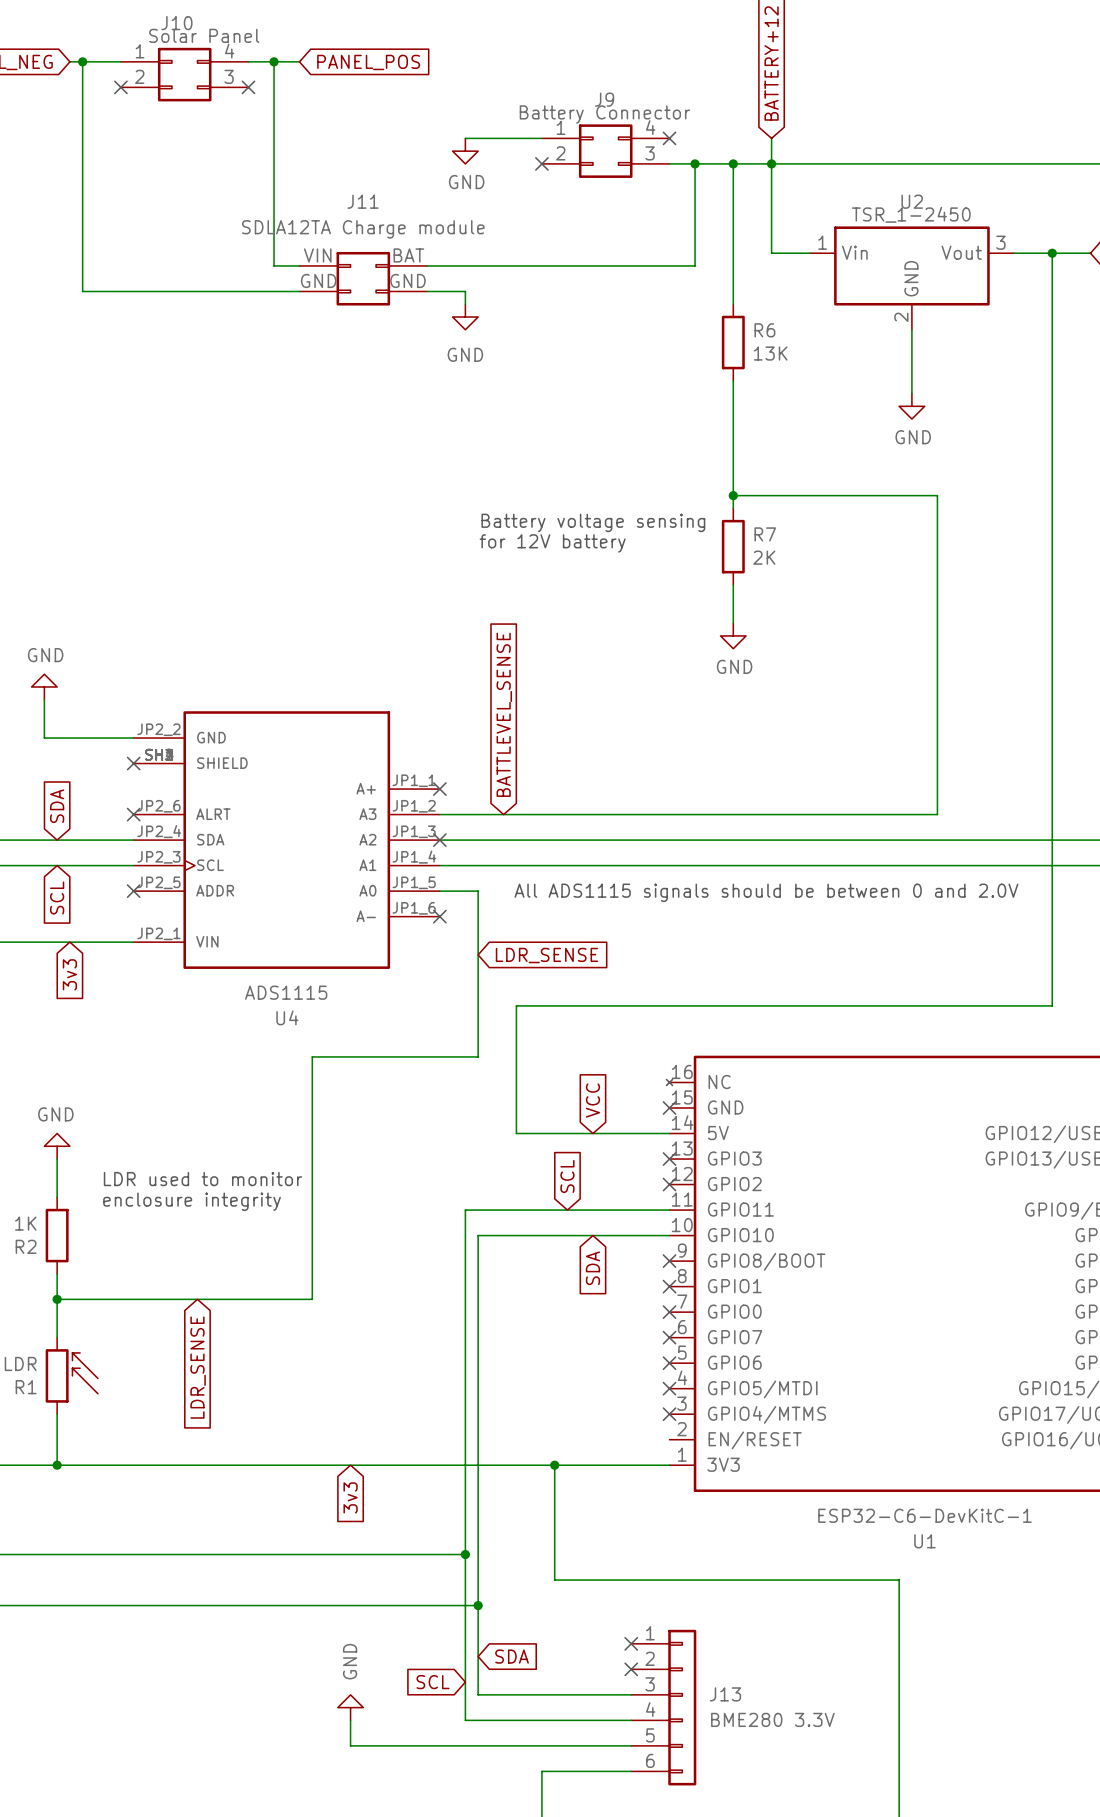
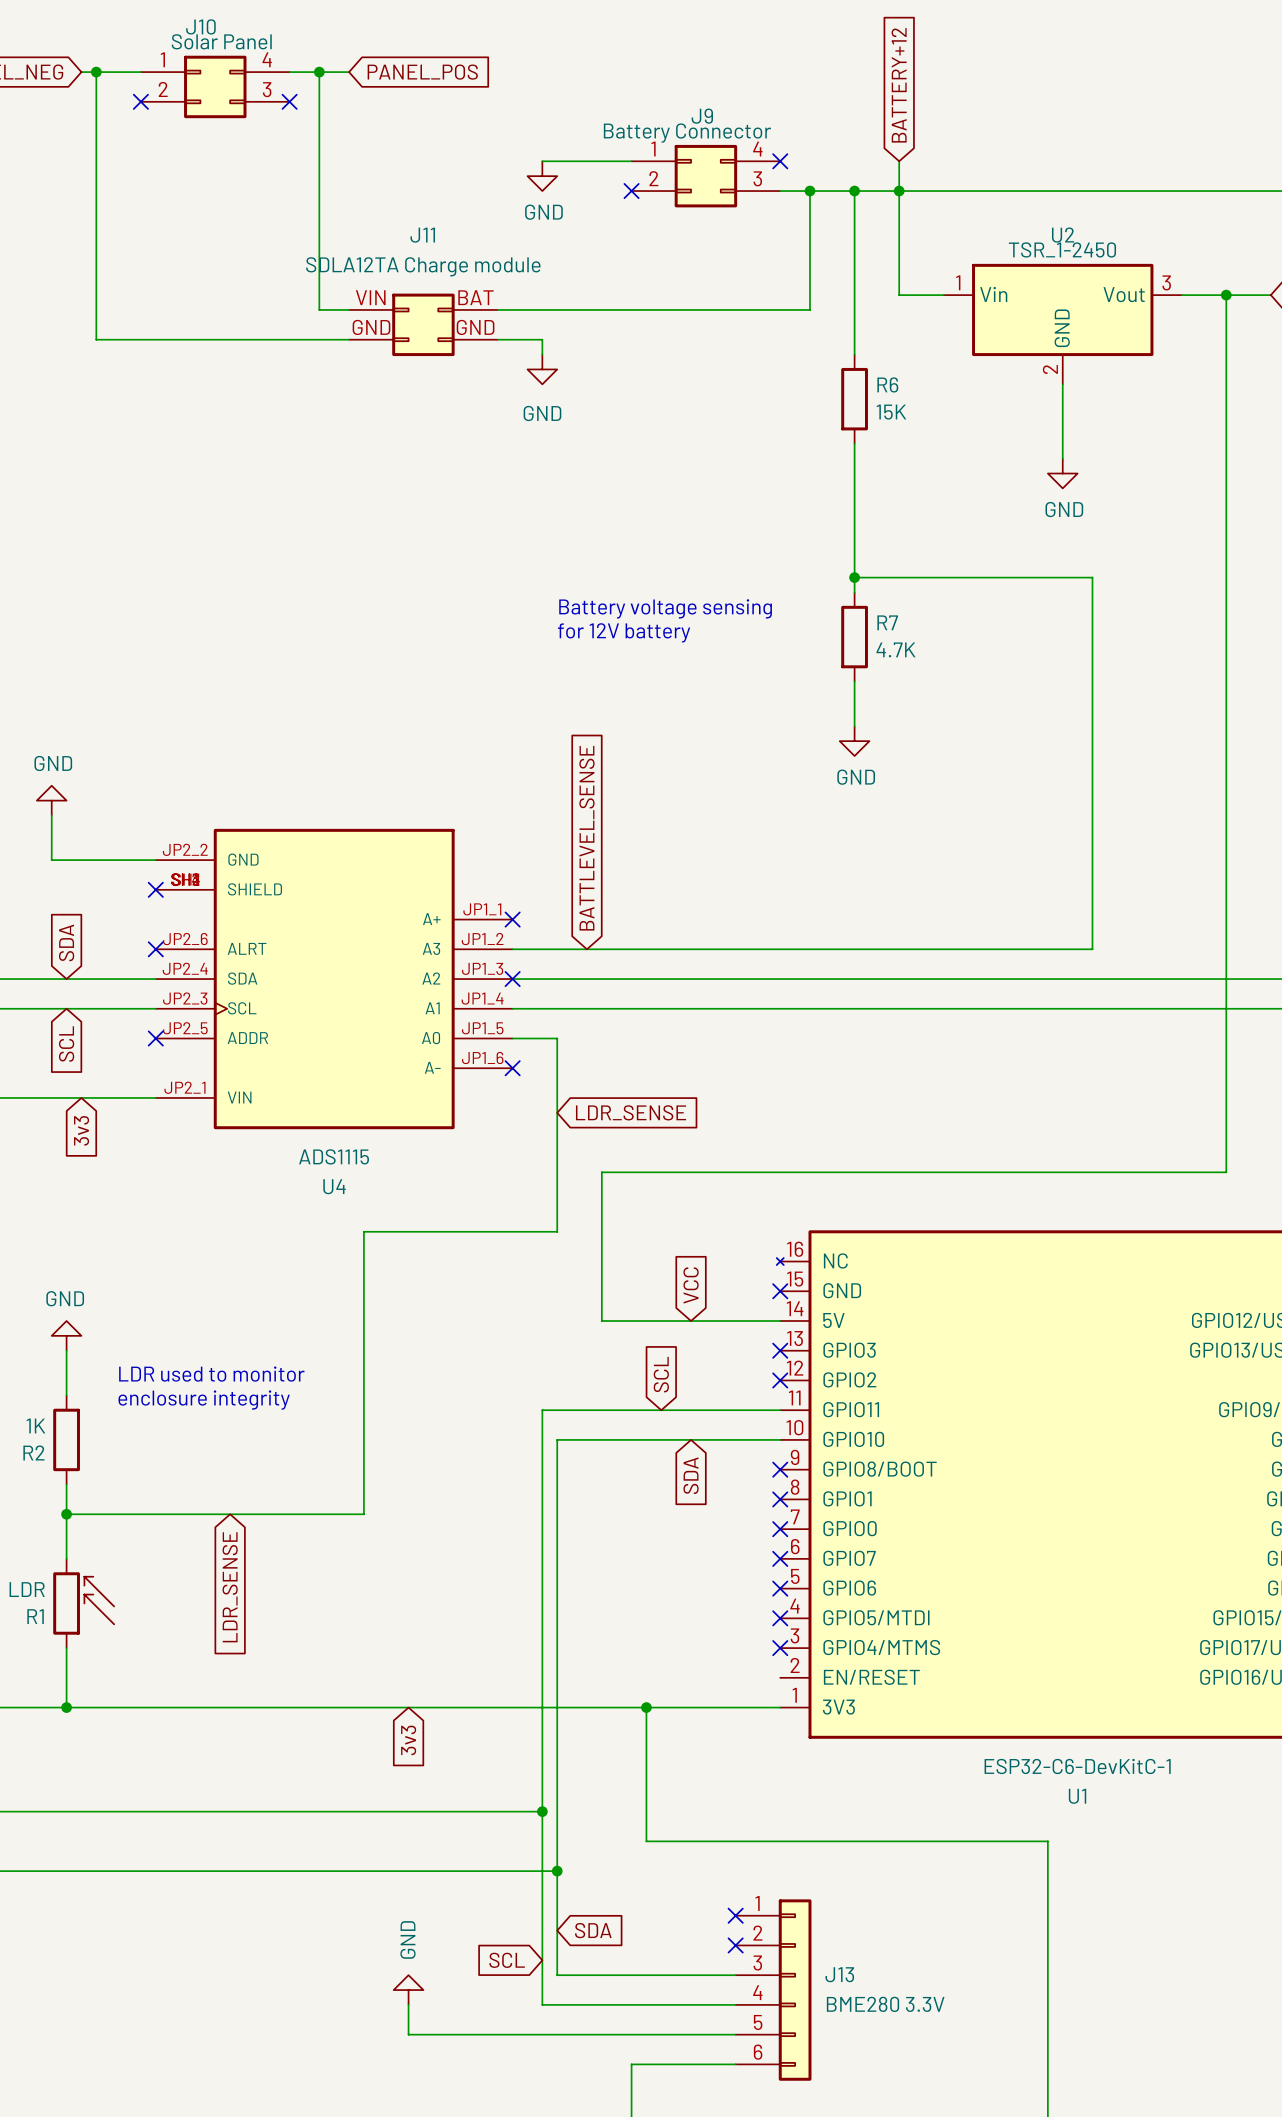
R6 value: 13K (770, 353) -> 15K (891, 412)
R7 value: 2K (764, 557) -> 4.7K (895, 649)
text: All ADS1115 signals should be between 0 and 2.0V (766, 892) -> none

